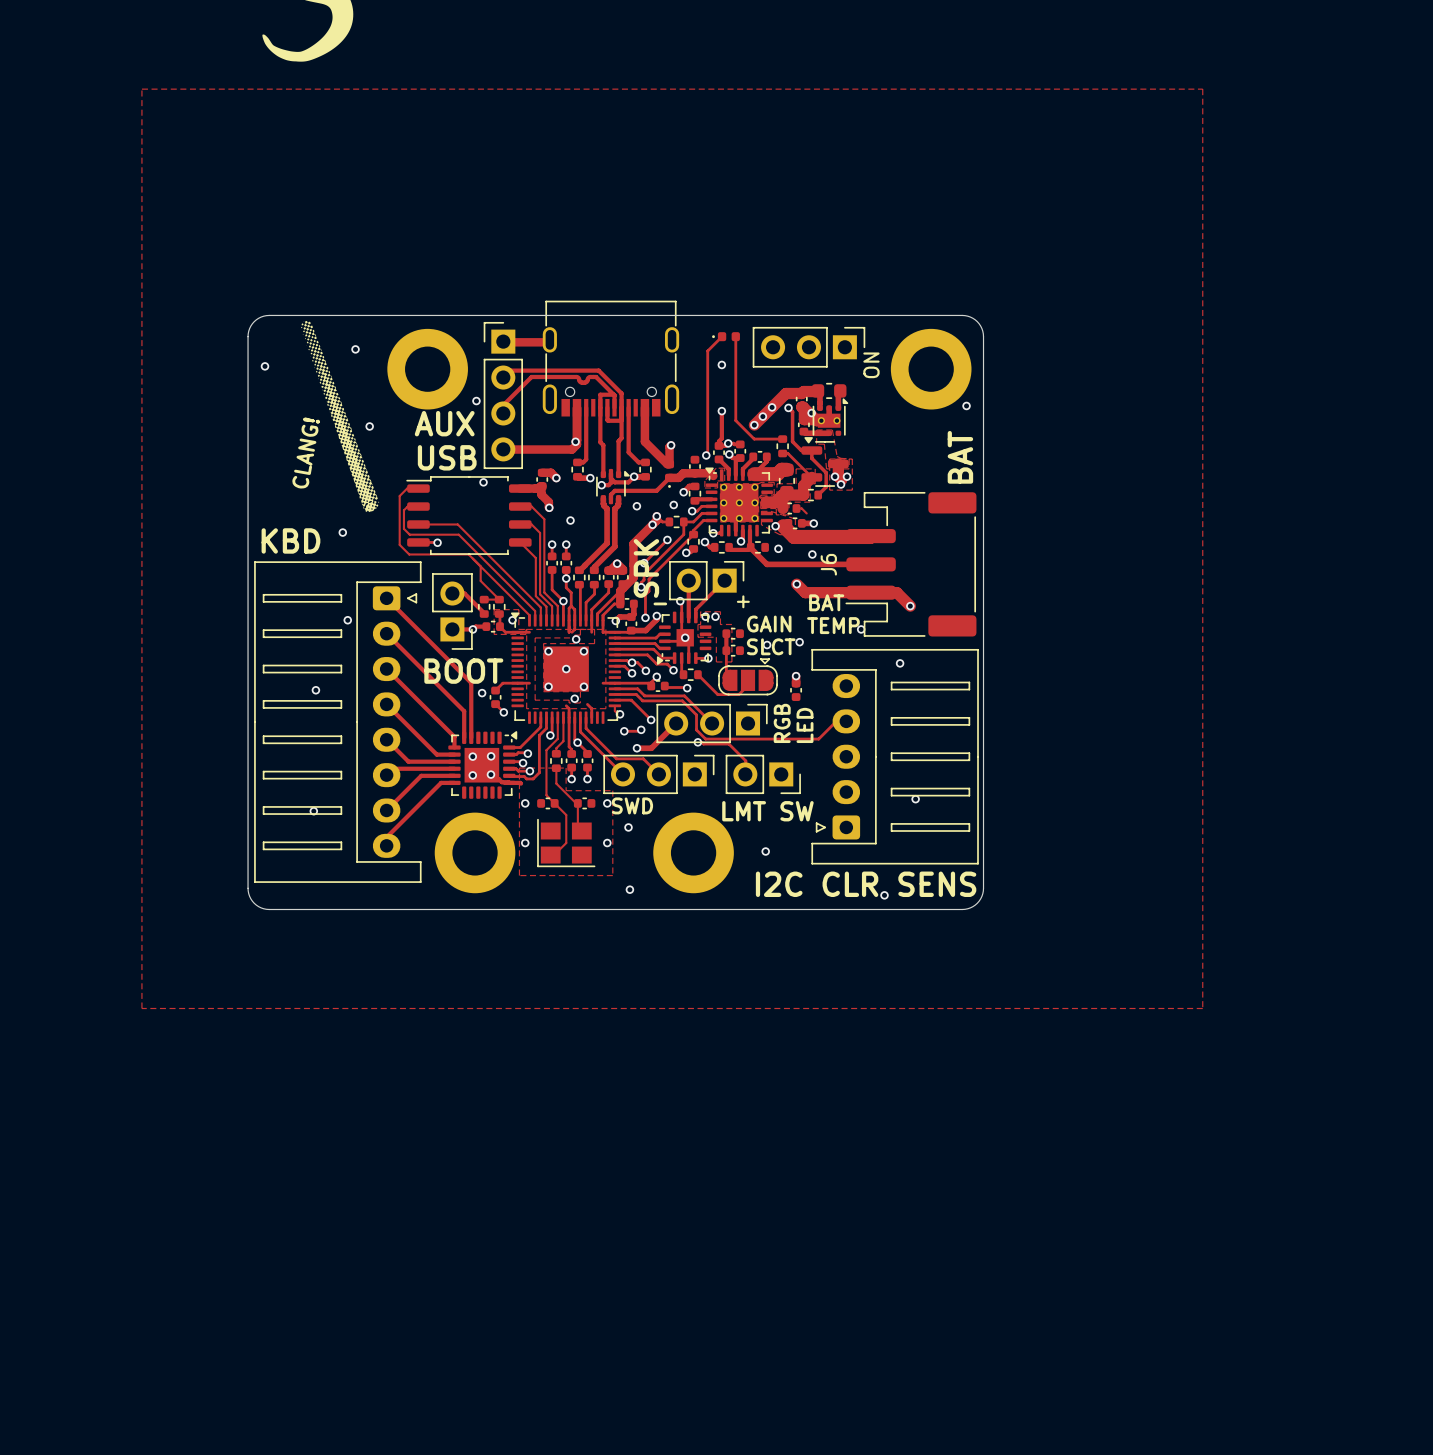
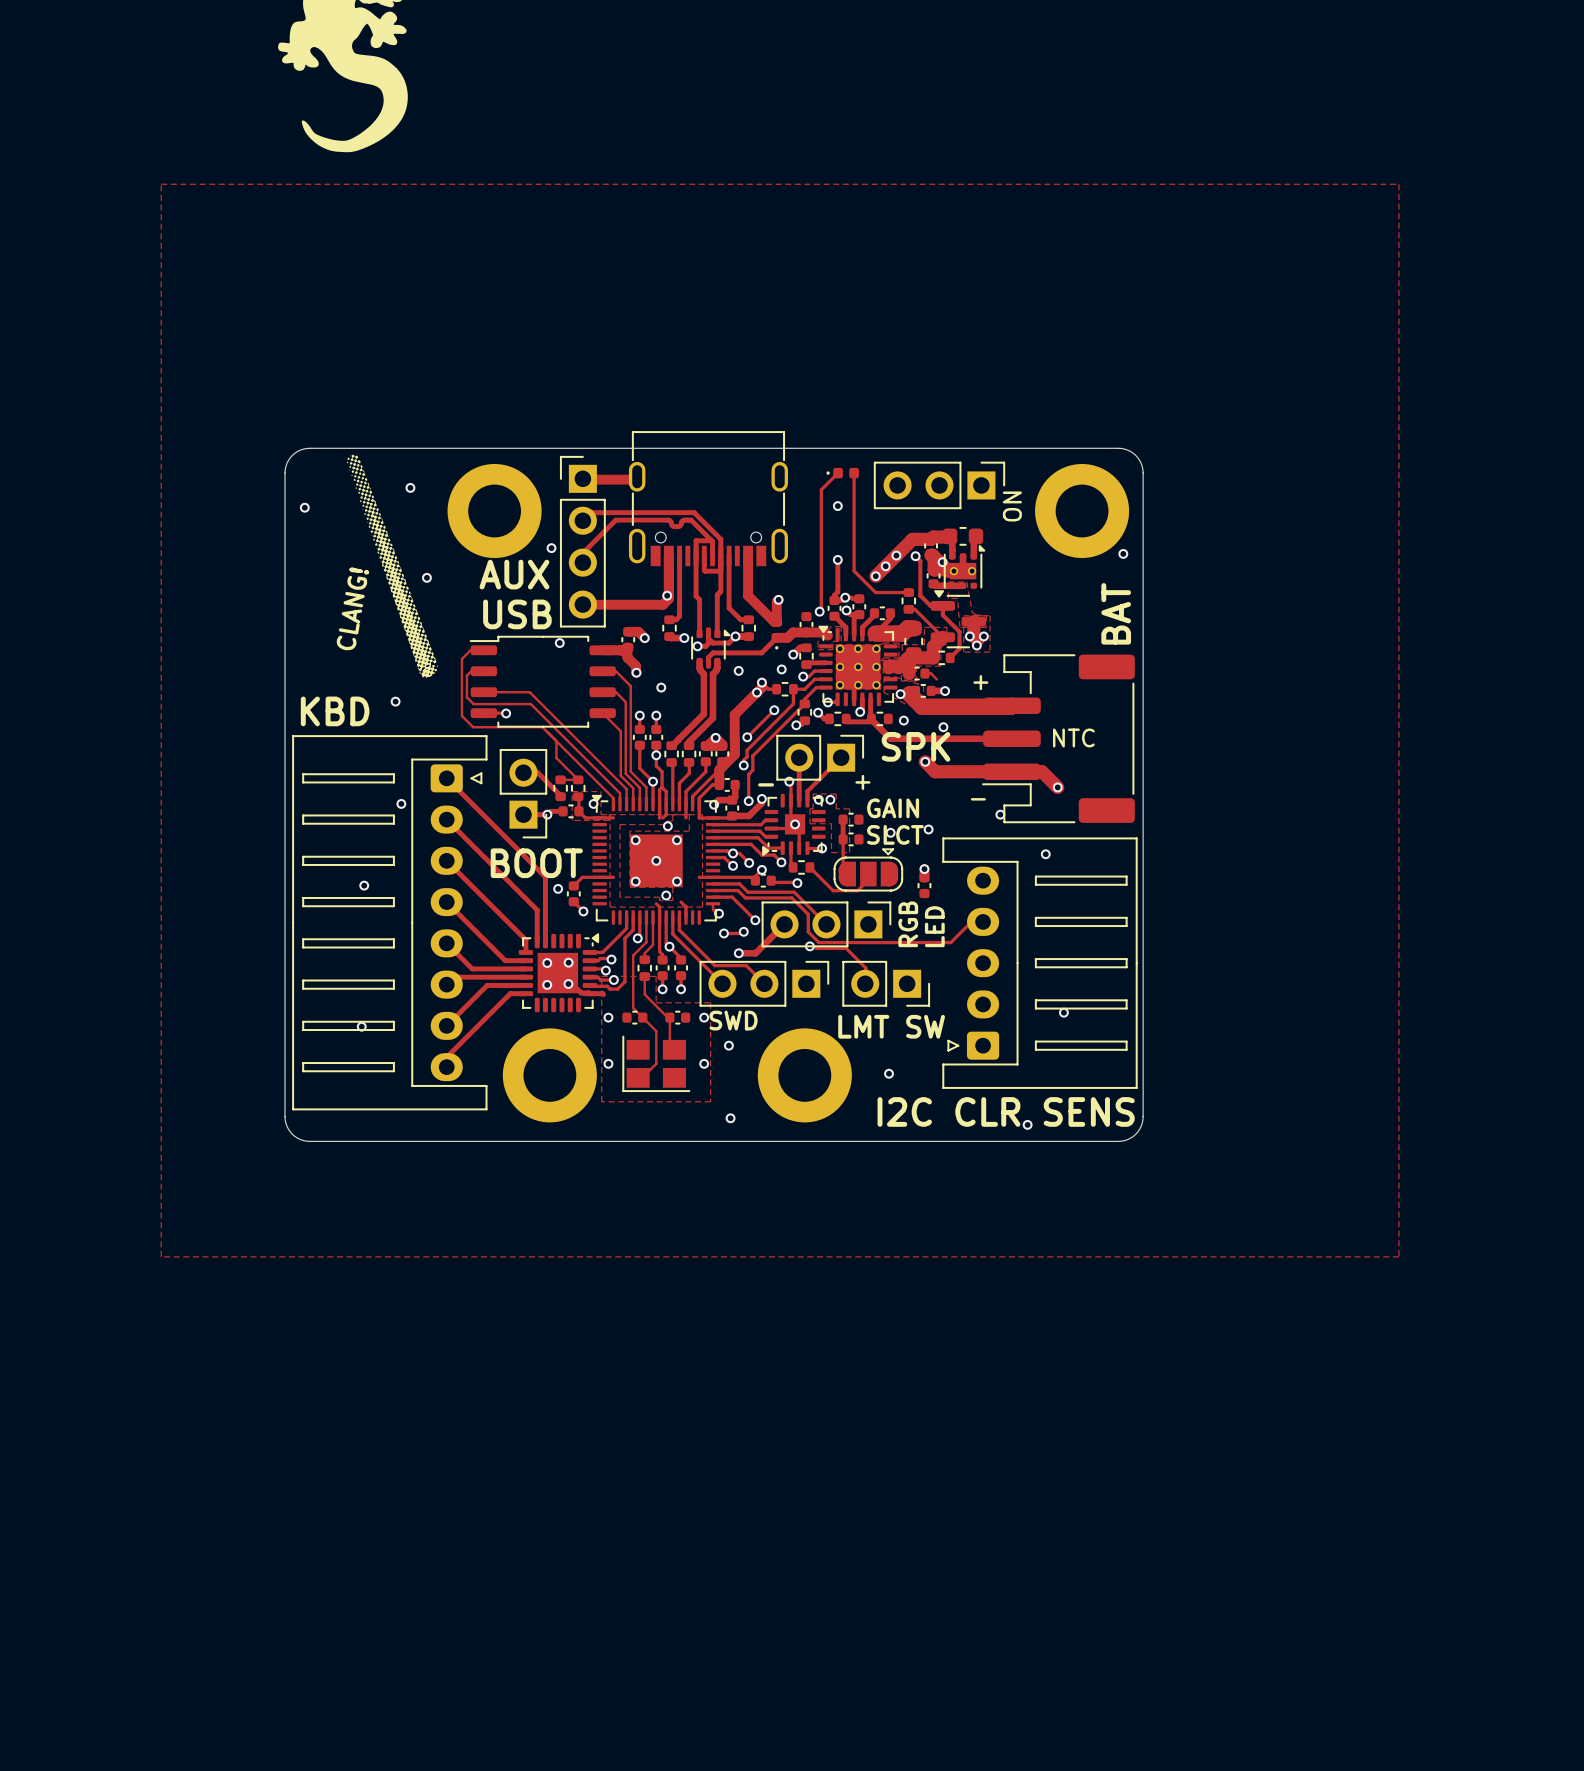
text: none -> + (980, 682)
text: none -> NTC (1073, 737)
J6 name: J6 (828, 564) -> none
text rotation: 0° (646, 568) -> 90° clockwise (916, 746)
text position: SPK (646, 568) -> SPK (916, 746)
text: BAT (826, 602) -> none
text: none -> - (978, 799)
text: TEMP (833, 625) -> none

